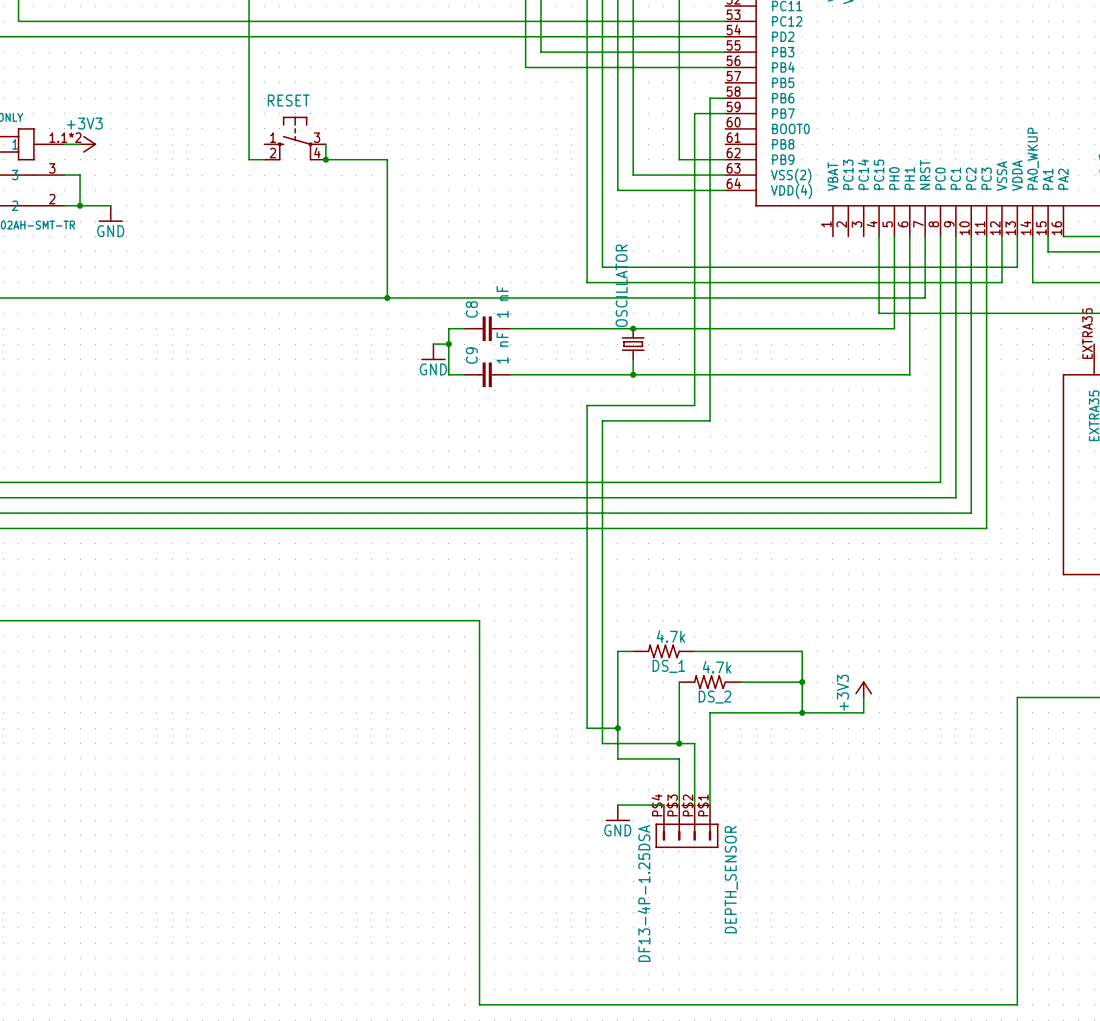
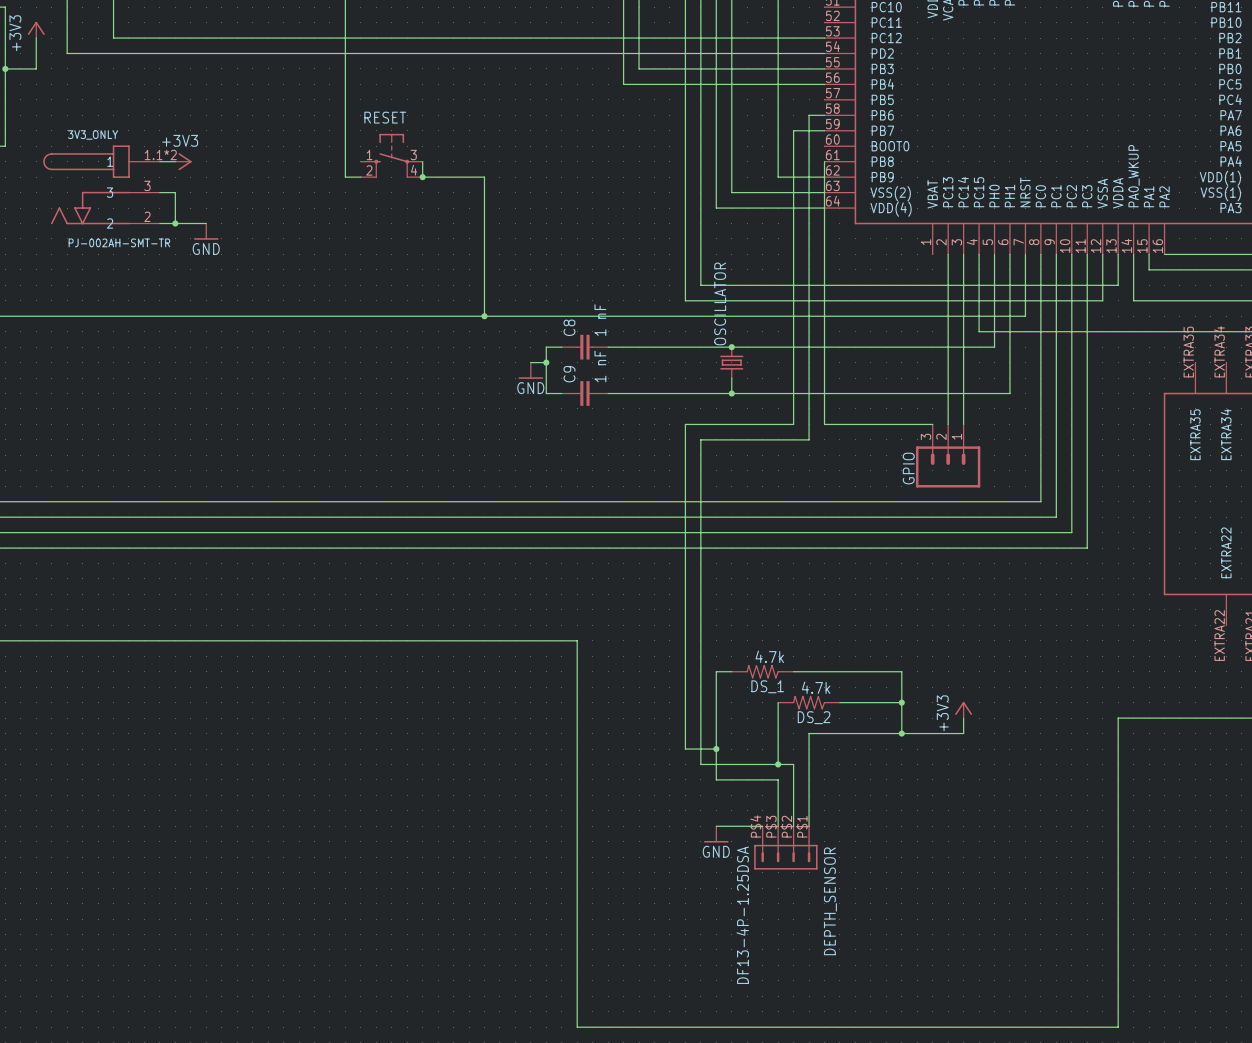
wire: none -> (824, 161) (824, 424) (932, 424)
wire: none -> (948, 254) (948, 424)
wire: none -> (963, 254) (963, 424)
GPIO: none -> (948, 455)

